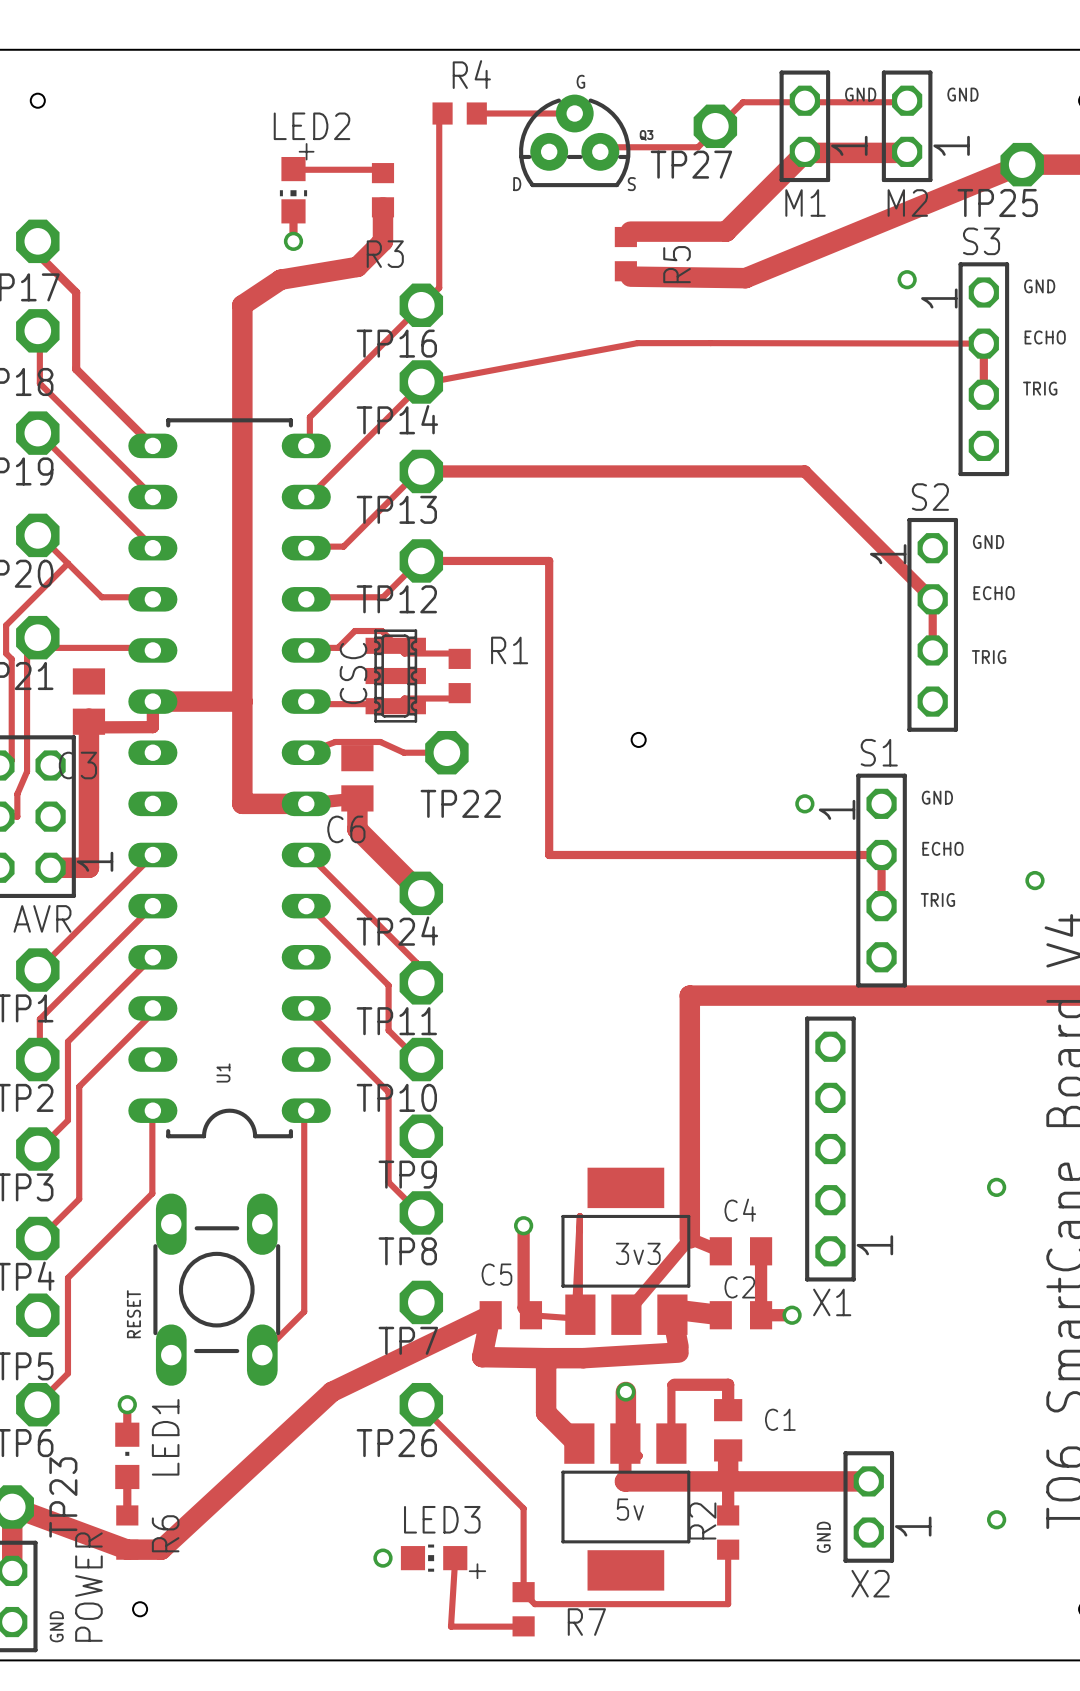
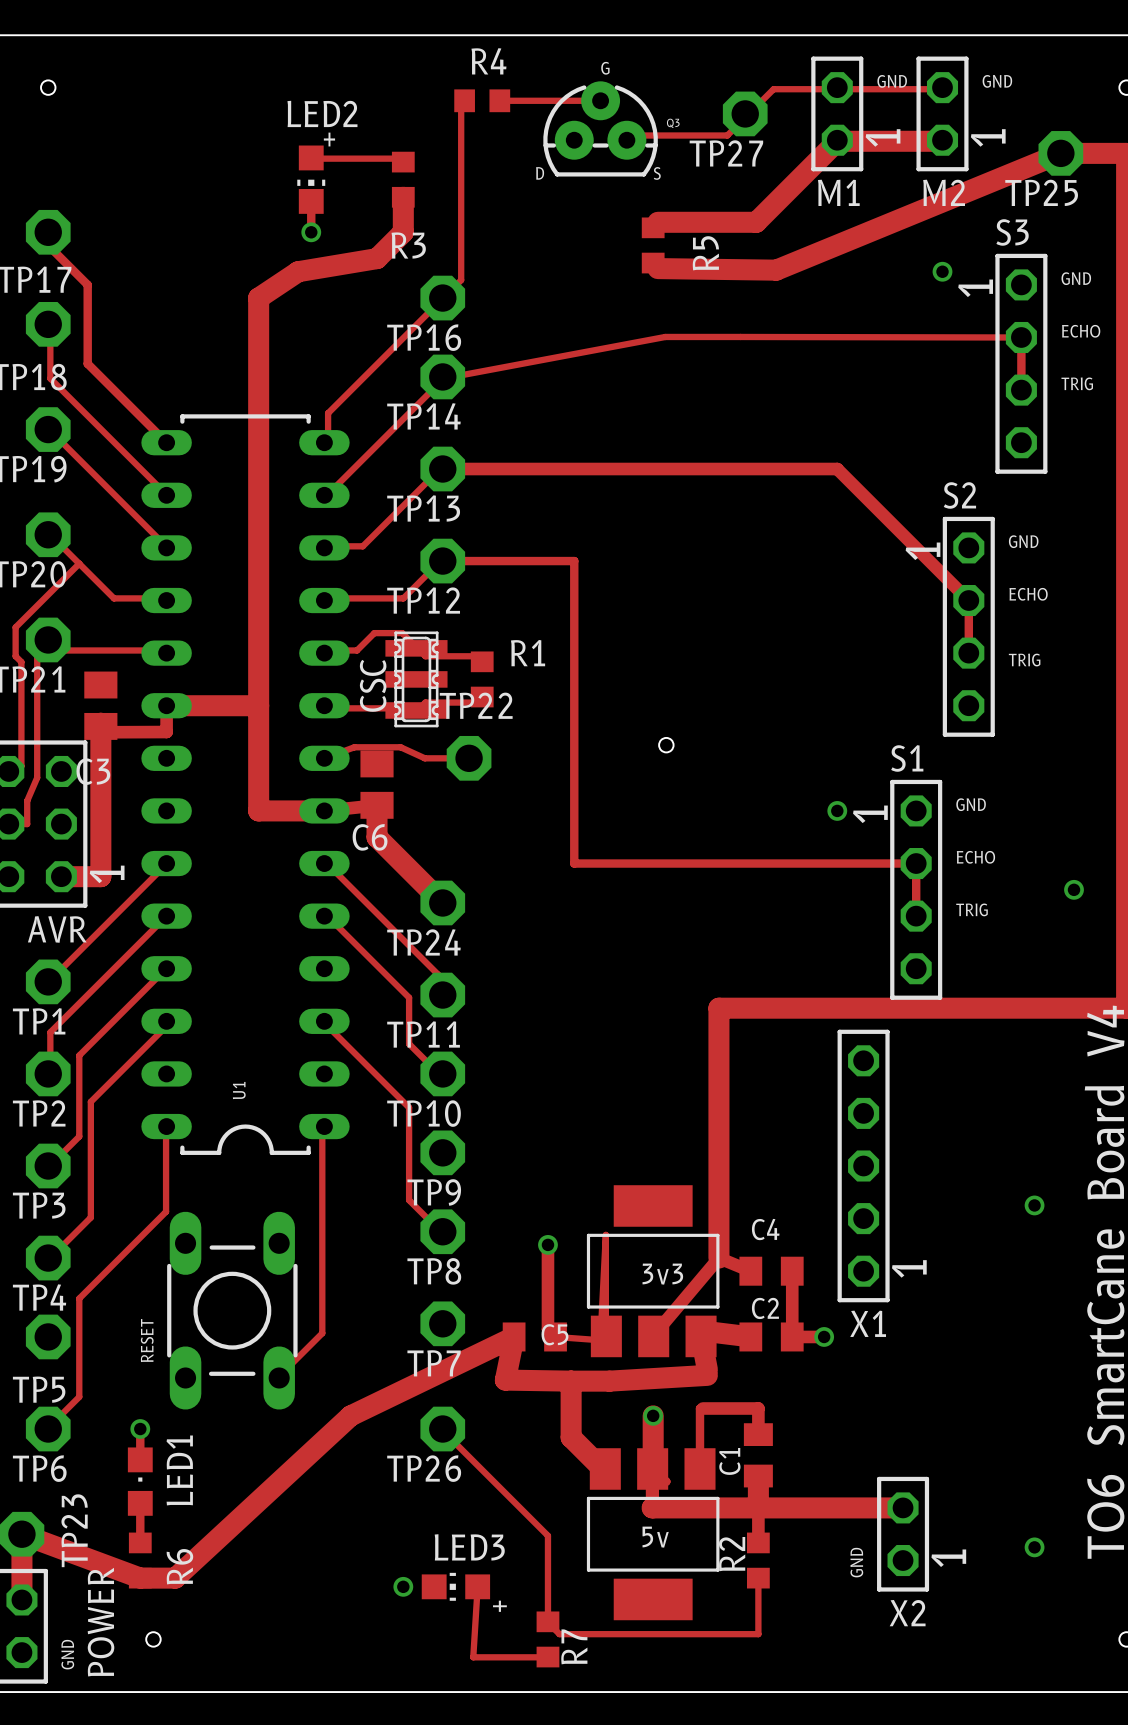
TP22 name position: TP22 (460, 803) -> TP22 (476, 705)
C5 name position: C5 (496, 1274) -> C5 (554, 1334)
C1 name rotation: 0° (780, 1419) -> 90° counterclockwise (729, 1461)
C1 name position: C1 (780, 1419) -> C1 (729, 1461)
R7 name rotation: 0° (586, 1622) -> 90° counterclockwise (574, 1646)

